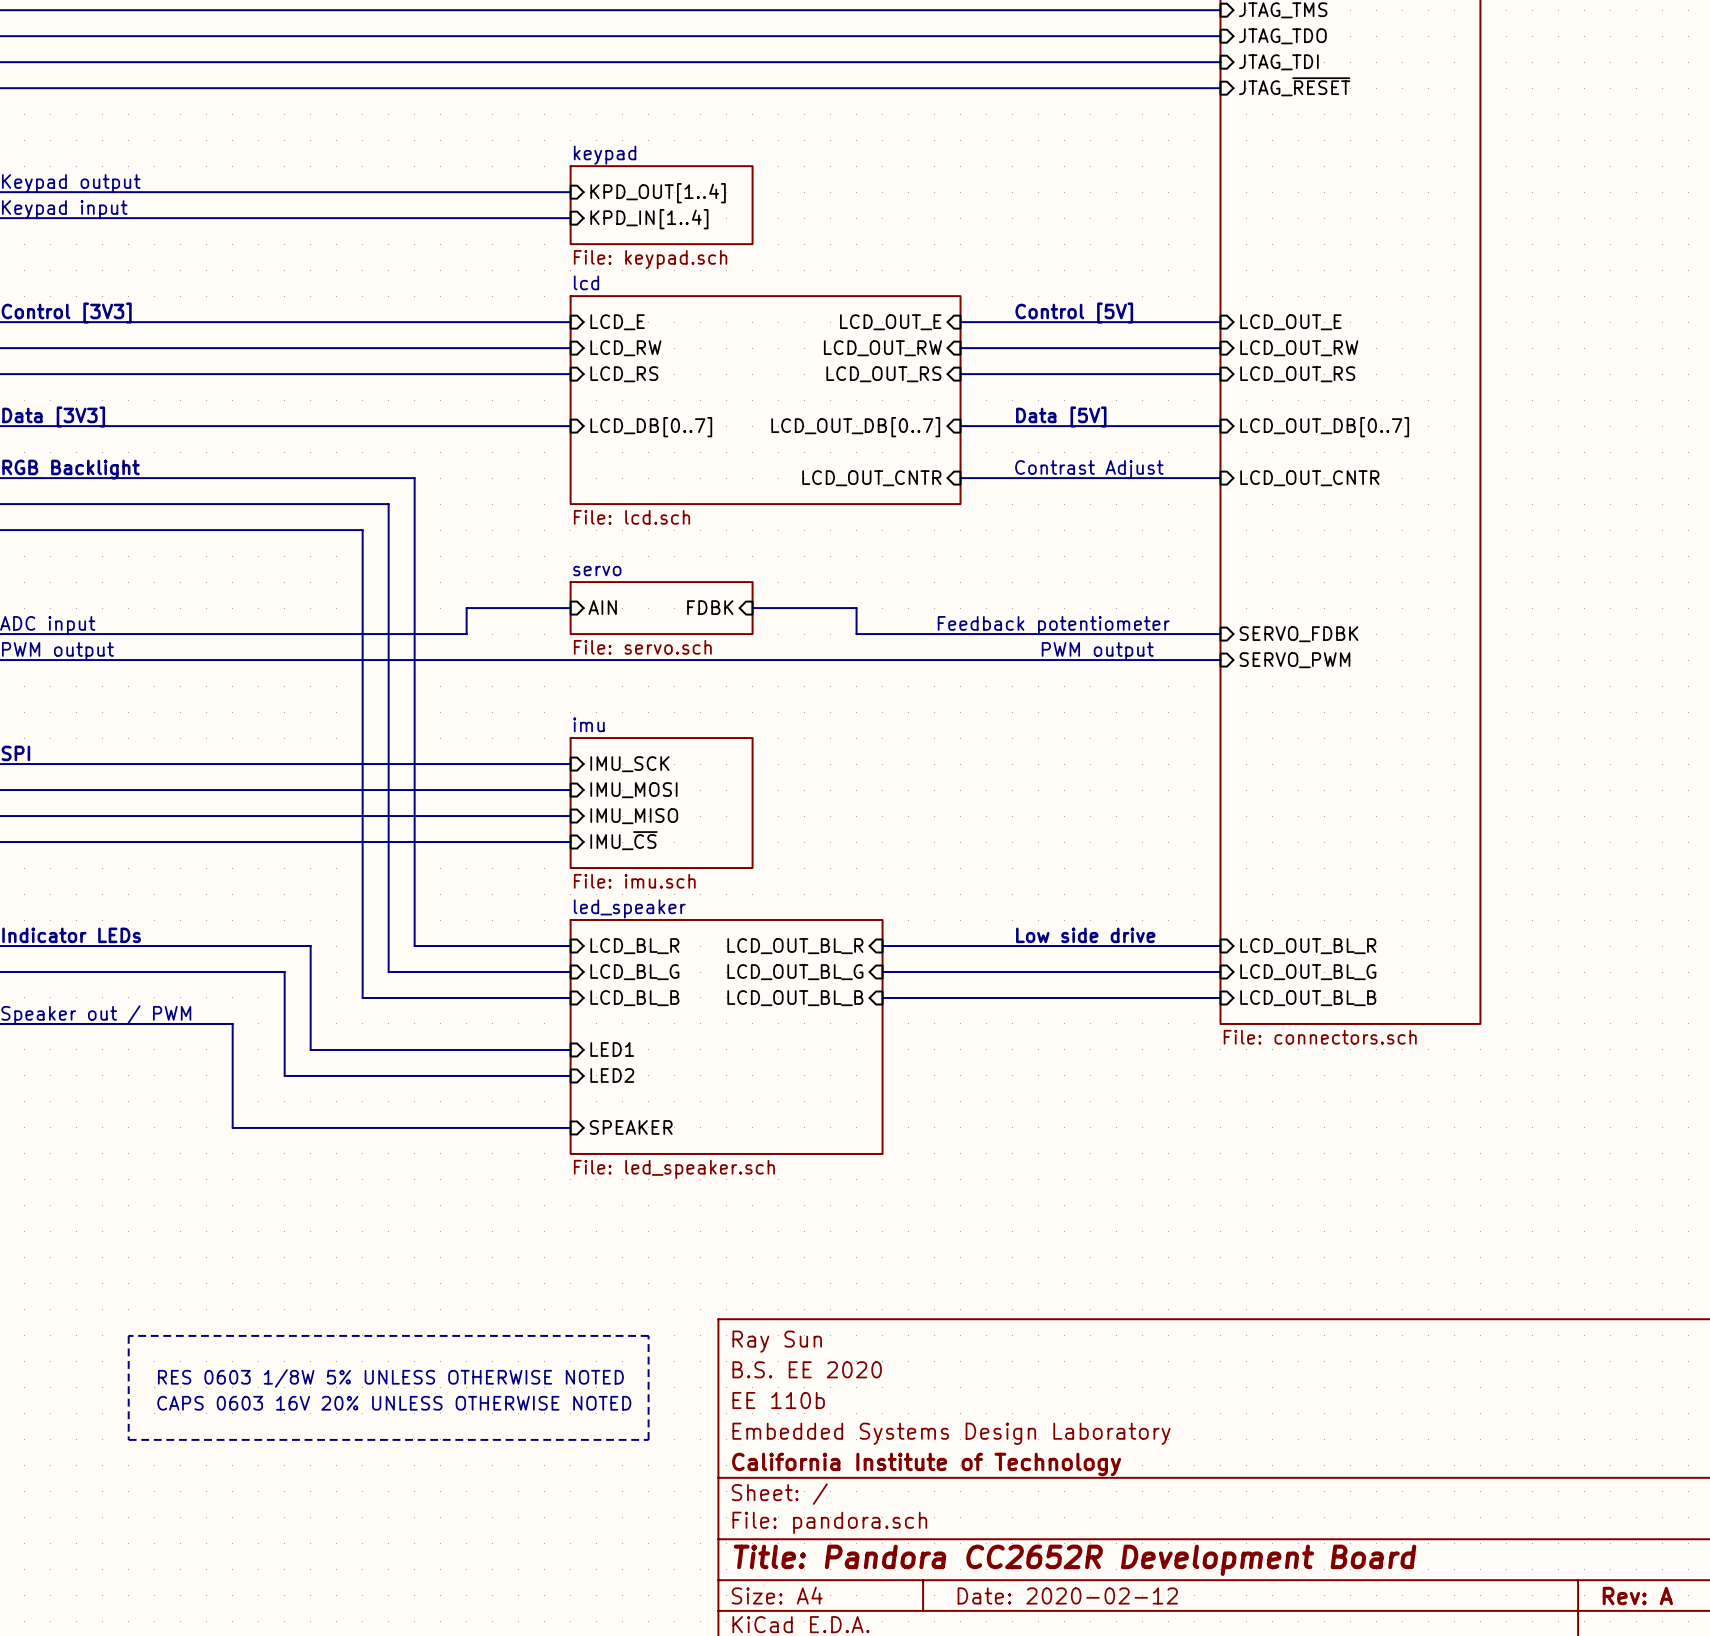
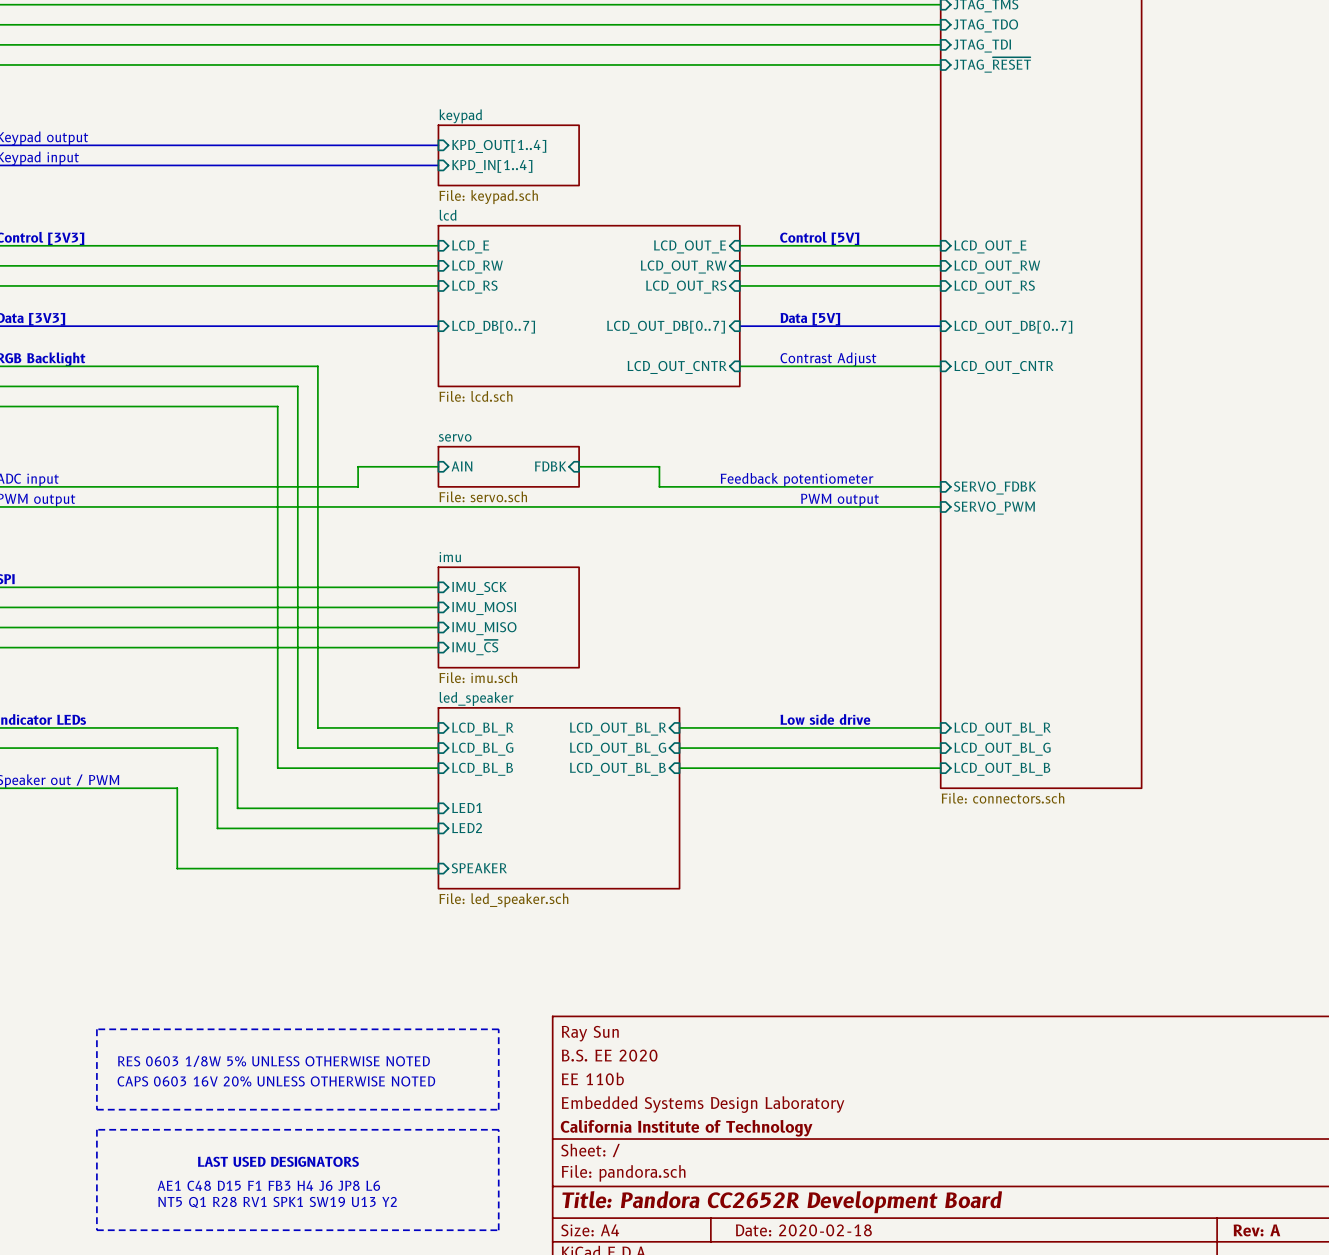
line: none -> (96, 1129) (96, 1230) (498, 1230) (498, 1129) (96, 1129)
text: none -> LAST USED DESIGNATORS (278, 1161)
text: none -> AE1 C48 D15 F1 FB3 H4 J6 JP8 L6 (268, 1185)
text: none -> NT5 Q1 R28 RV1 SPK1 SW19 U13 Y2 (277, 1202)
title block: Date: 2020-02-12 (1067, 1595) -> Date: 2020-02-18 (803, 1230)

